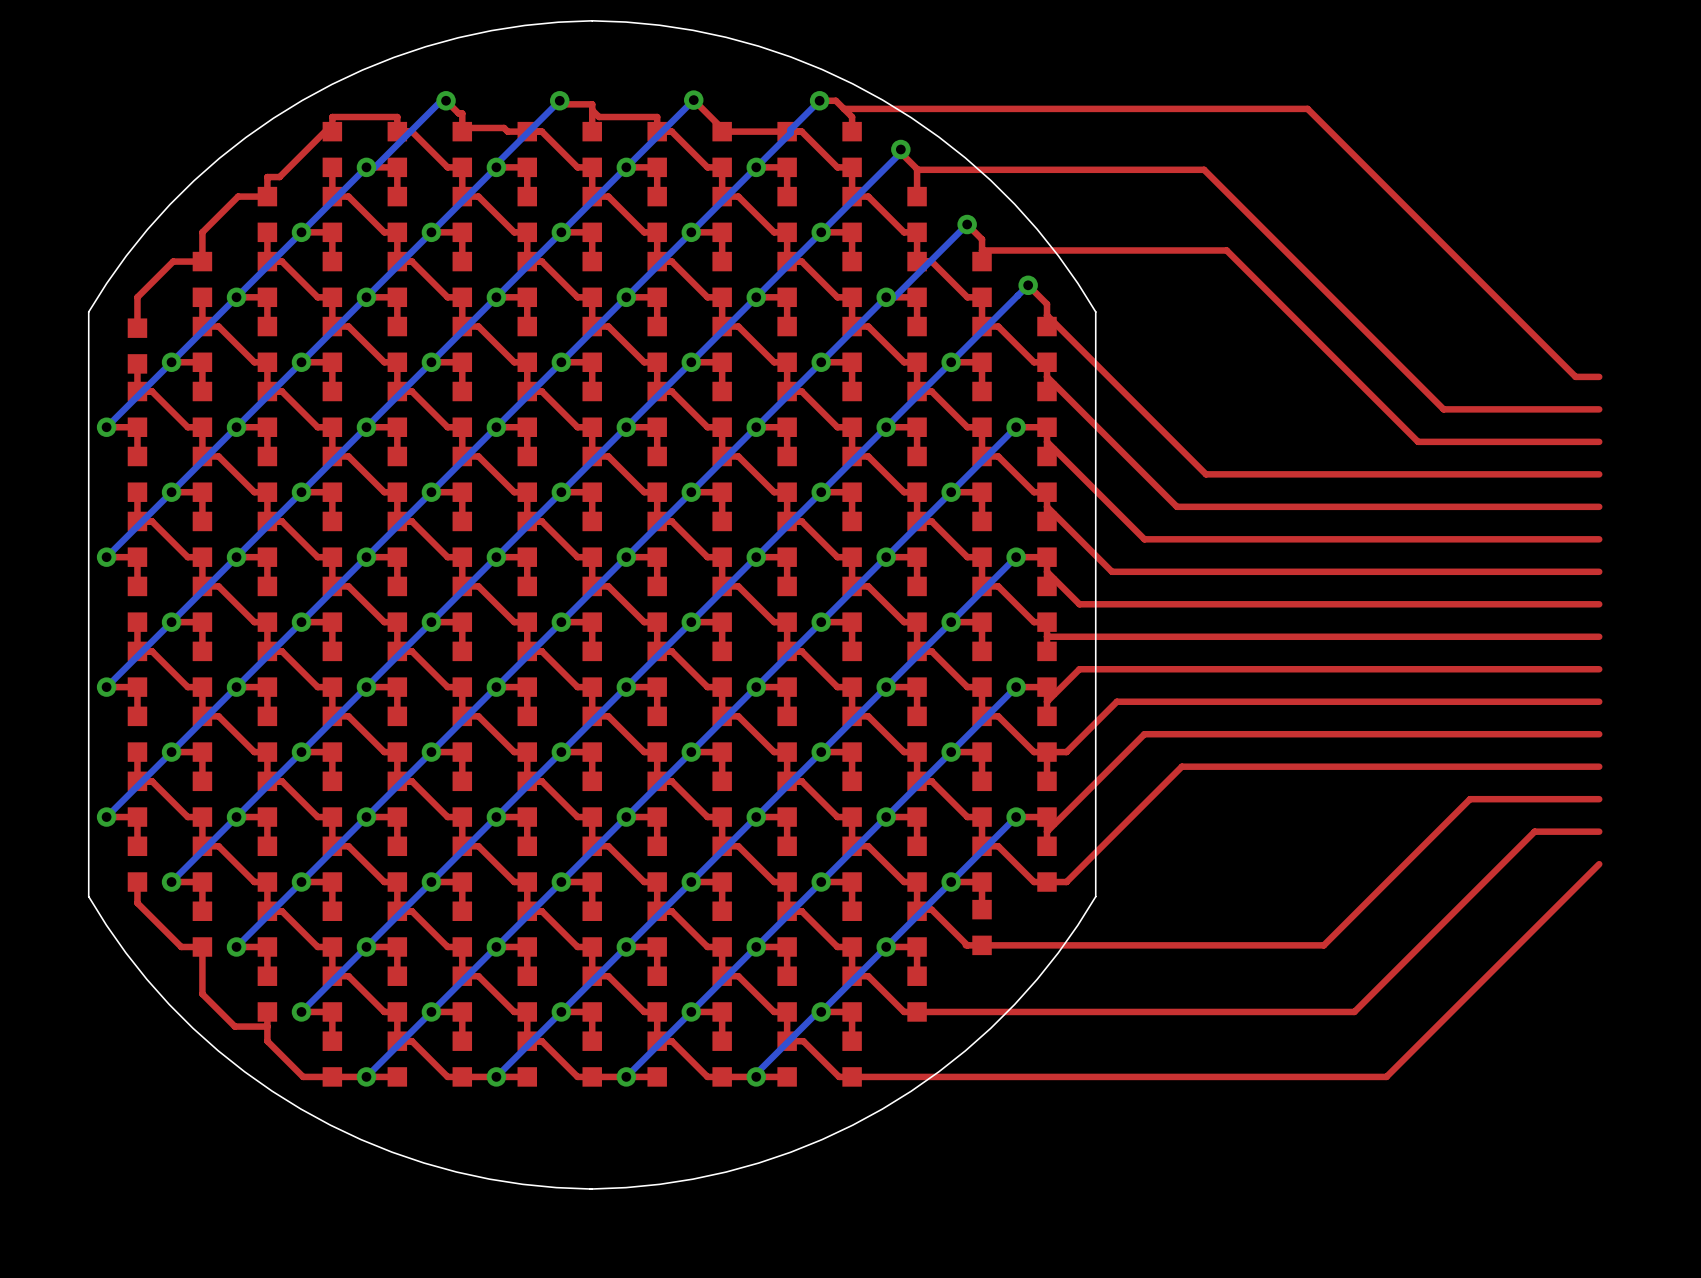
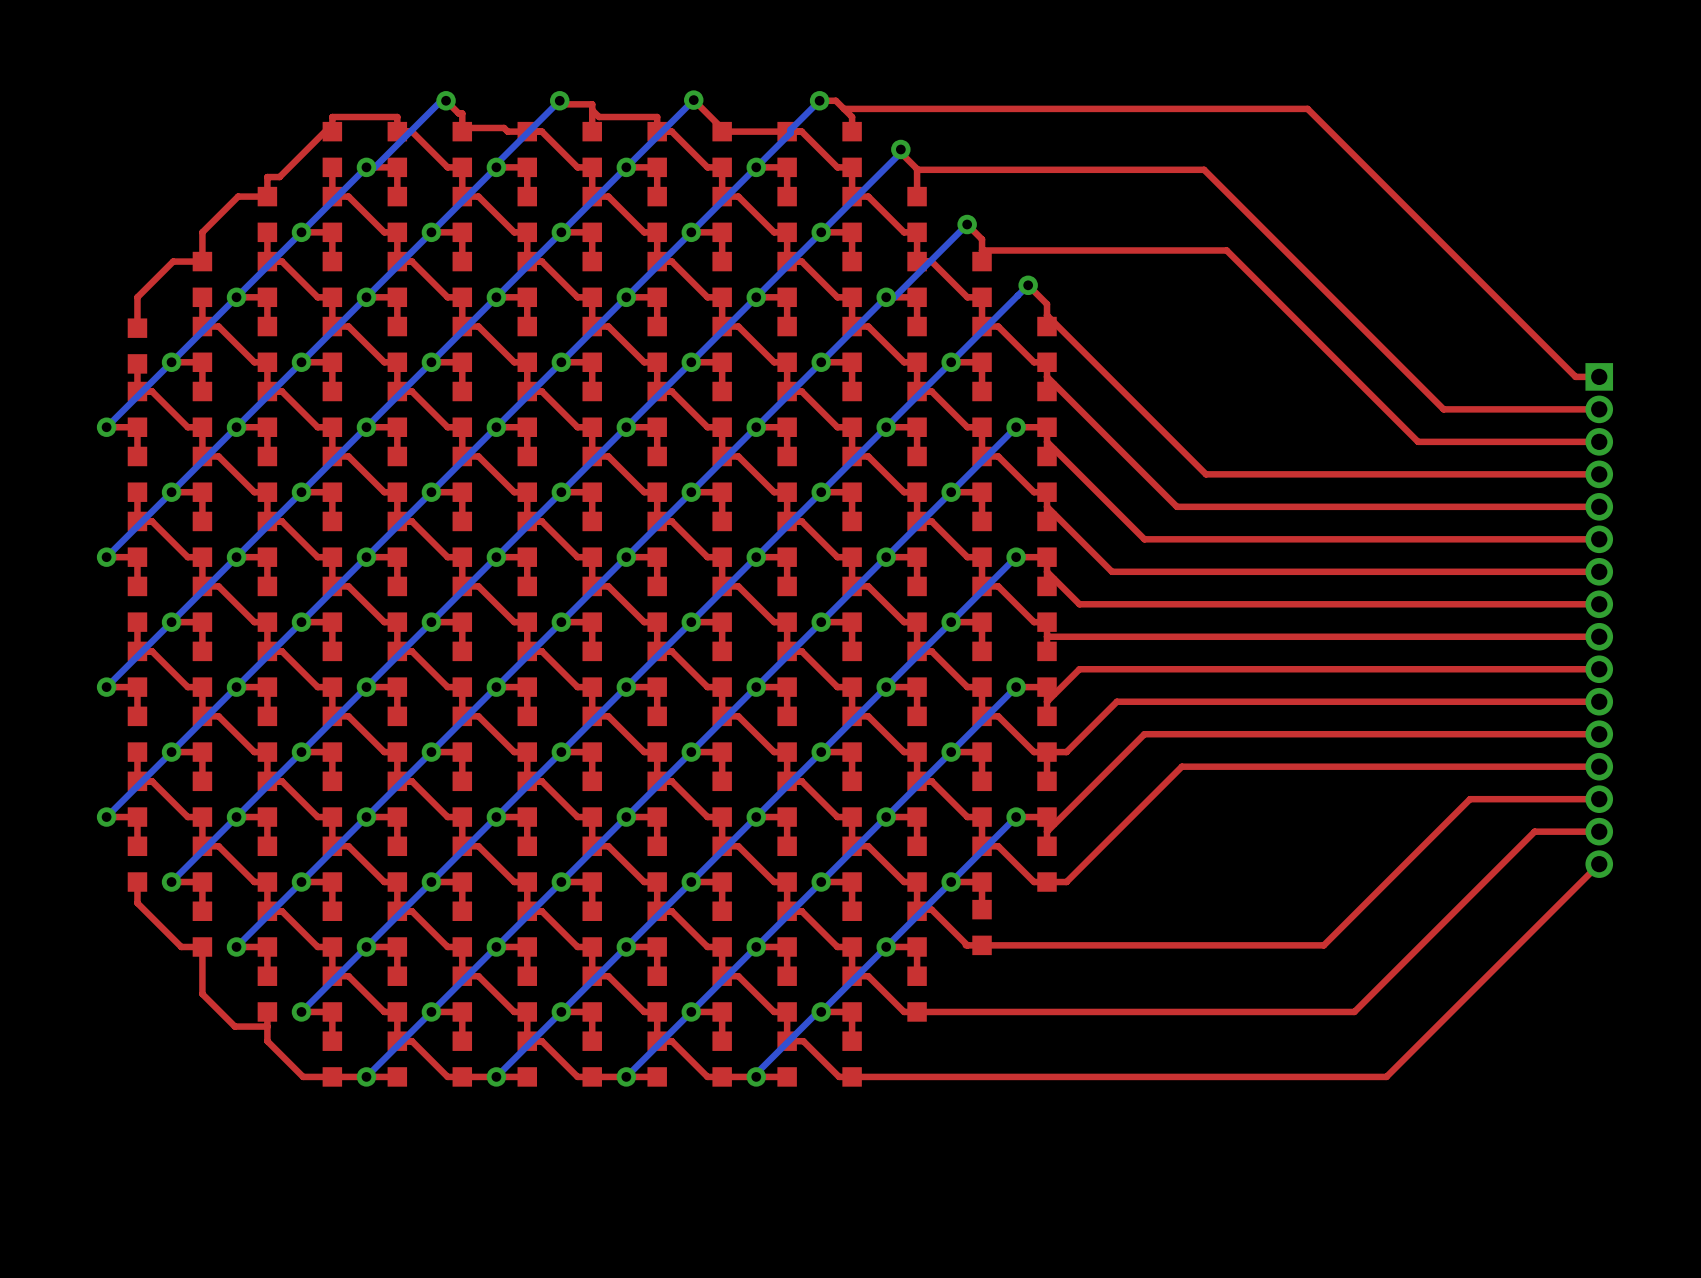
board edge: (592, 20) (659, 25) (726, 37) (790, 56) (852, 83) (882, 99) (938, 137) (965, 157) (1014, 204) (1058, 255) (1095, 311) (1095, 896) (1058, 952) (1014, 1004) (965, 1050) (911, 1091) (882, 1109) (852, 1125) (790, 1152) (726, 1172) (659, 1184) (590, 1188) (522, 1184) (489, 1179) (424, 1163) (360, 1139) (300, 1109) (244, 1071) (193, 1028) (146, 979) (125, 952) (88, 896) (88, 311) (126, 255) (147, 229) (194, 180) (245, 137) (302, 100) (362, 69) (425, 46) (458, 37) (524, 25) (592, 20) -> none
part: none -> (1599, 620)

